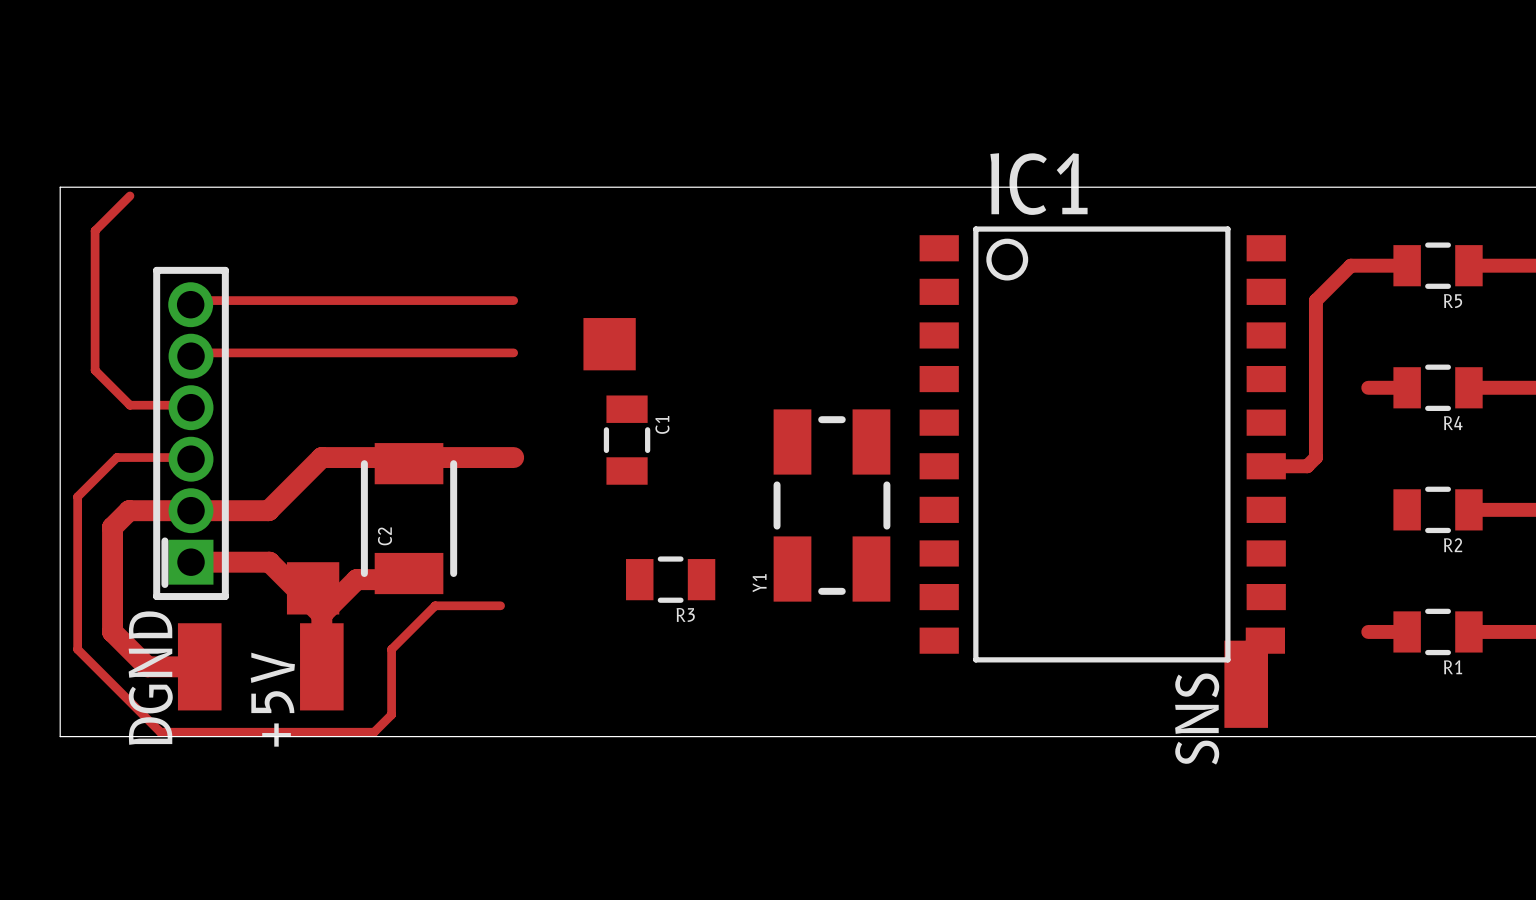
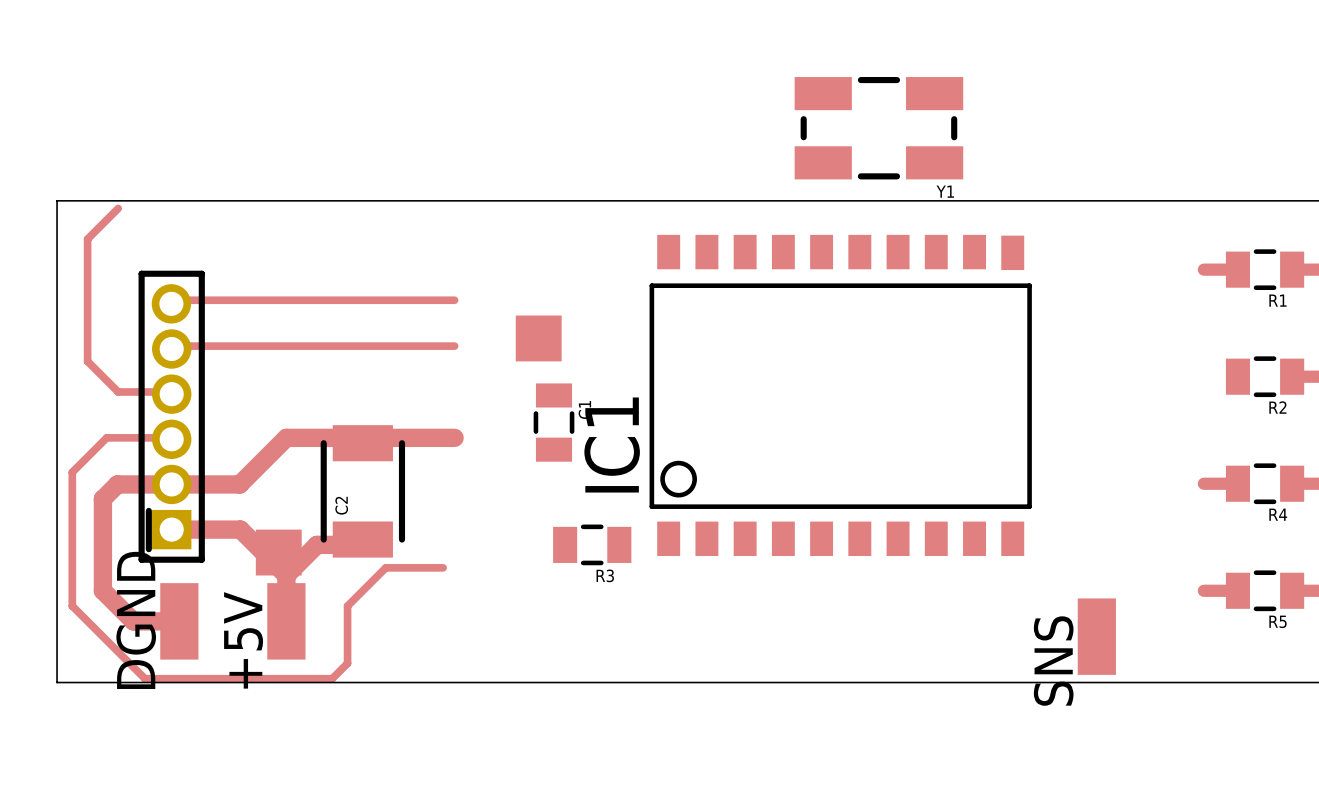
top track: (1368, 265) (1350, 265) (1315, 300) (1315, 457) (1307, 466) (1266, 466) -> none
R5 name: R5 (1453, 301) -> R1 (1277, 300)
top track: (1368, 387) (1407, 387) -> (1203, 483) (1237, 483)
R4 name: R4 (1453, 423) -> R2 (1277, 407)
IC1 rotation: 0° (1102, 444) -> 90° counterclockwise (840, 395)
Y1 rotation: 0° (831, 505) -> 90° clockwise (878, 128)
Y1 position: (831, 505) -> (878, 128)
R2 name: R2 (1453, 545) -> R4 (1278, 514)
Y1 name position: Y1 (759, 583) -> Y1 (945, 191)
R1 name: R1 (1453, 667) -> R5 (1278, 621)

